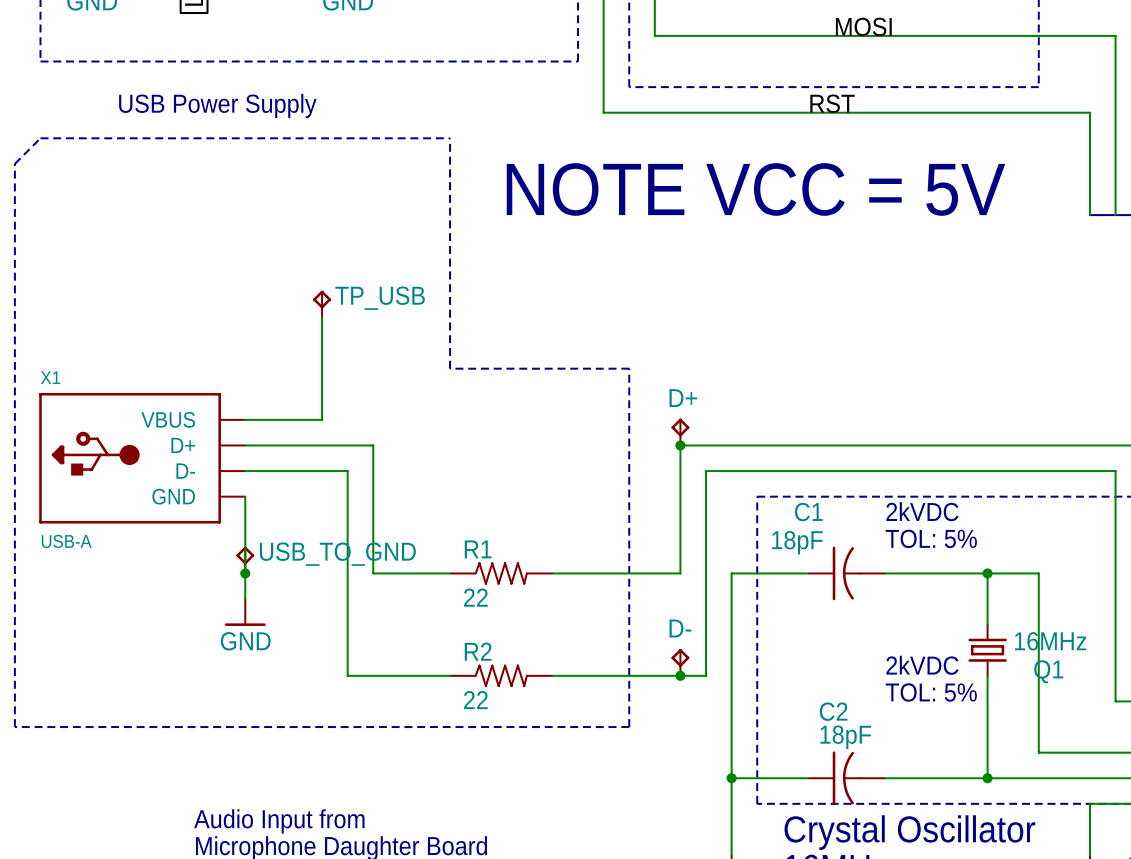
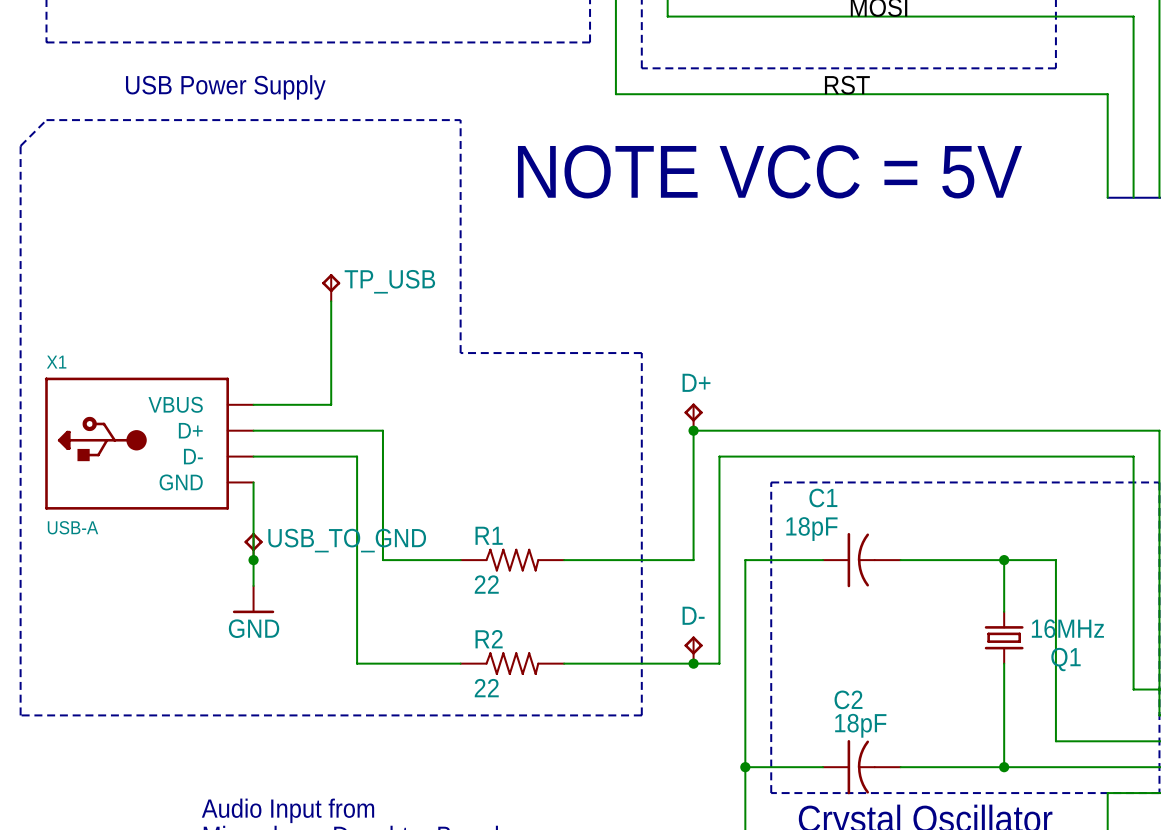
text: 2kVDC (922, 511) -> none
text: TOL: 5% (931, 538) -> none
text: 2kVDC (922, 665) -> none
text: TOL: 5% (931, 692) -> none

